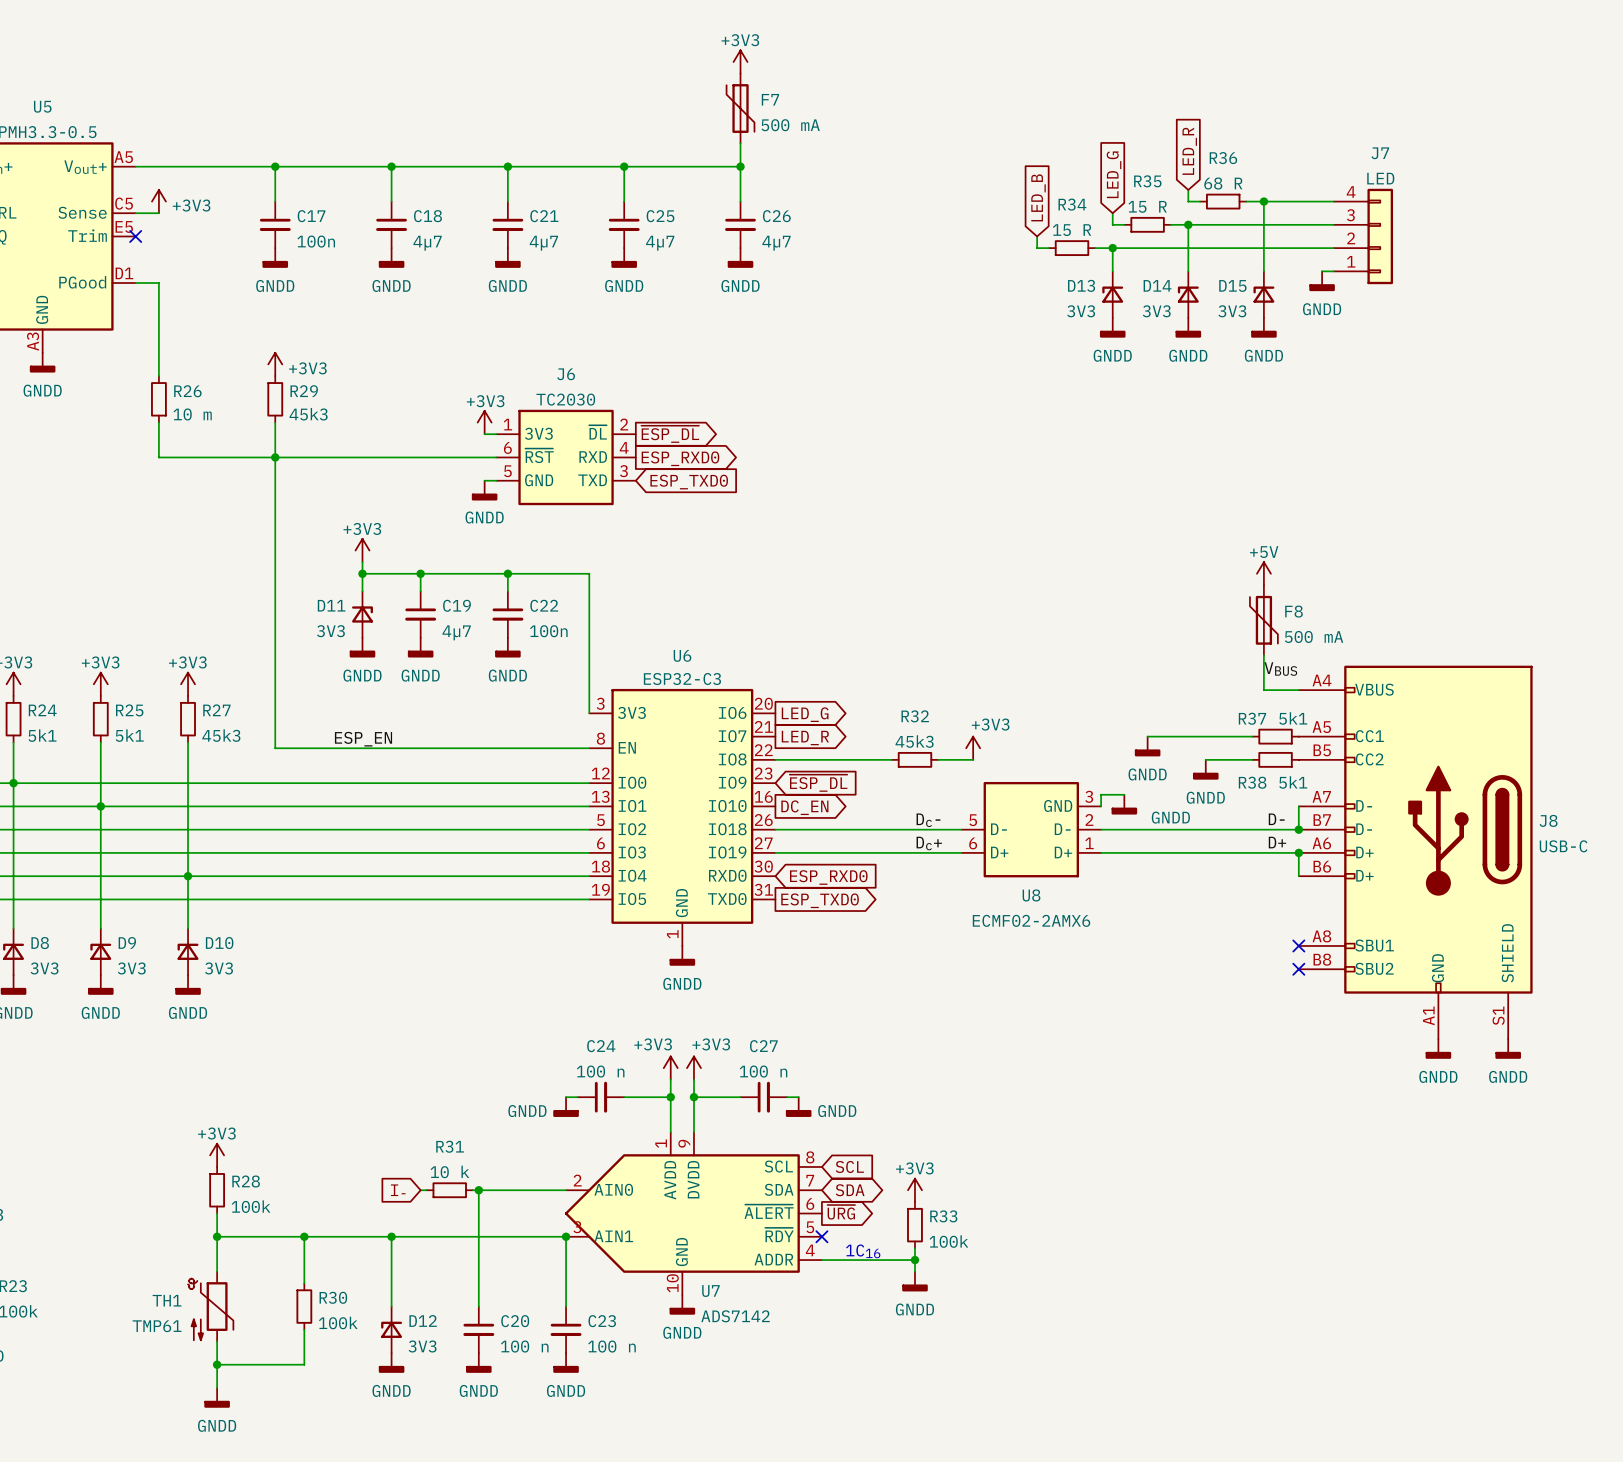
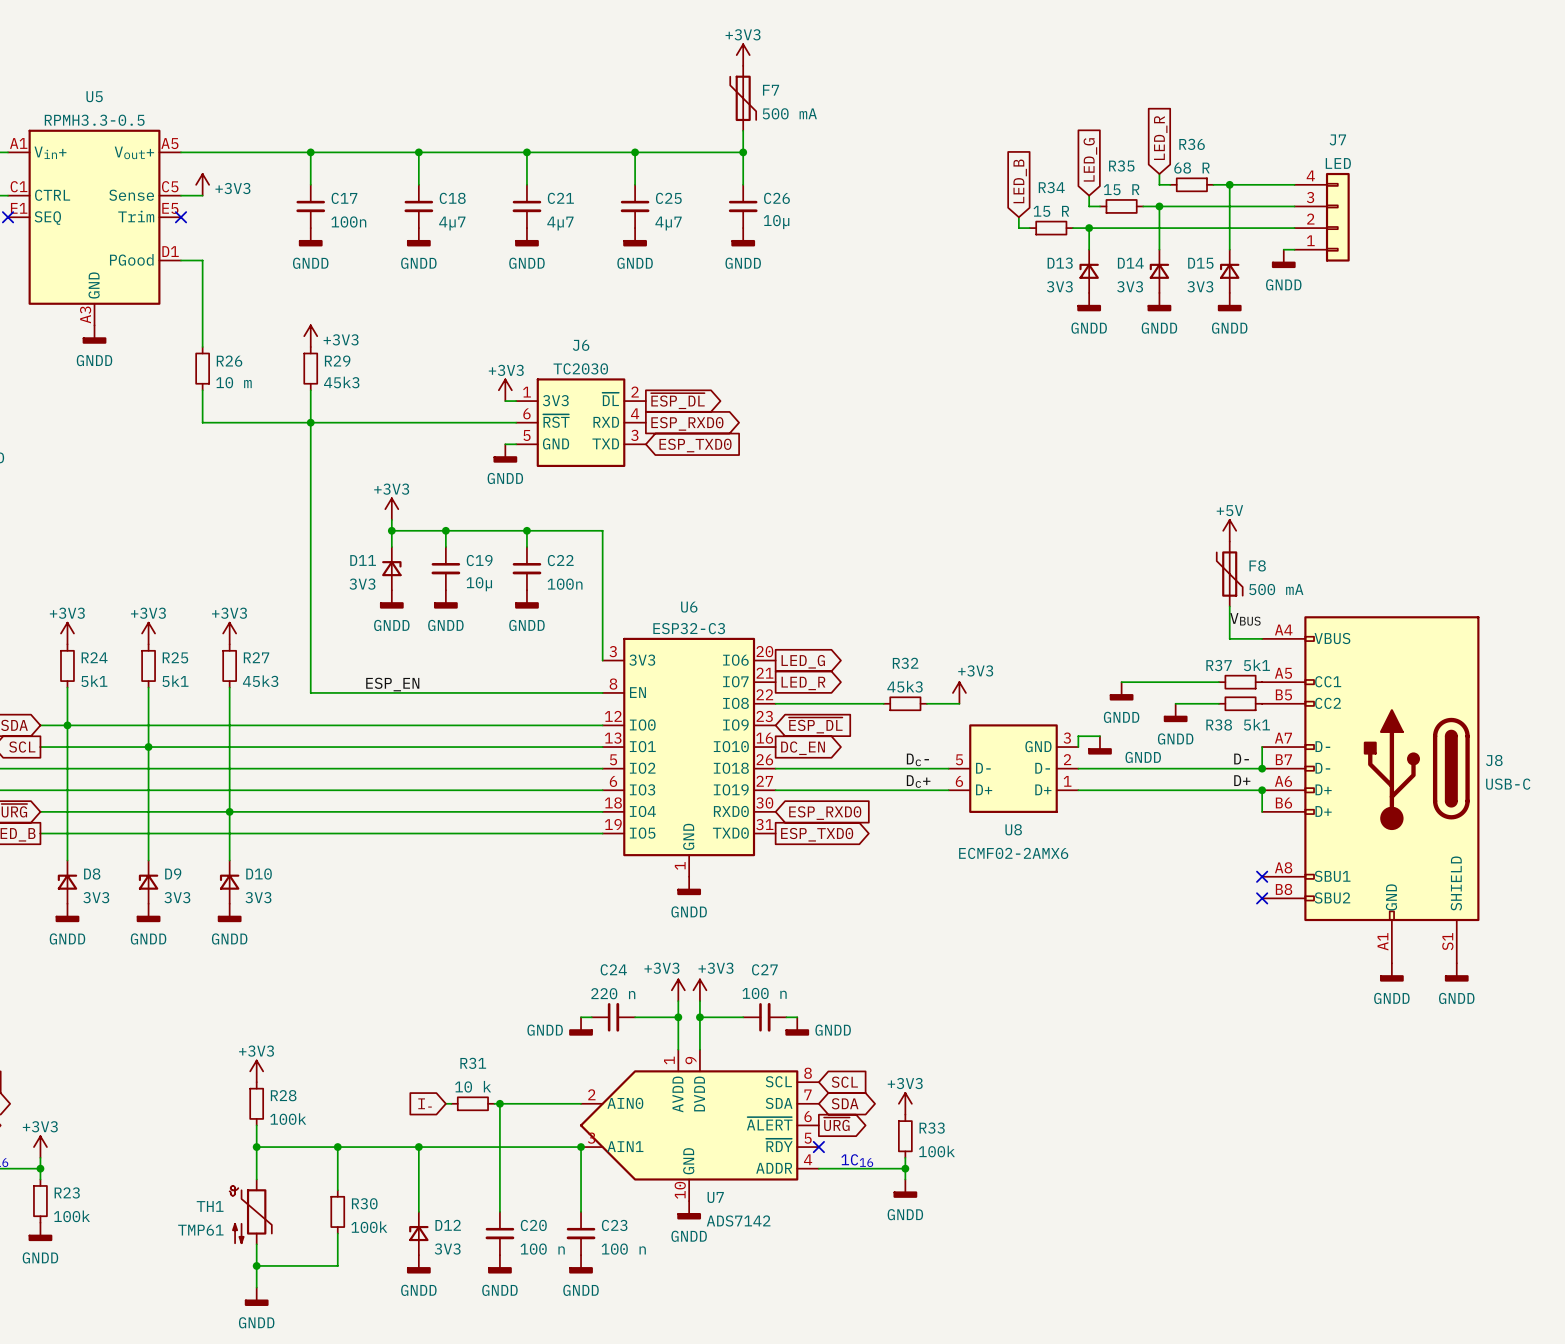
C26 value: 4µ7 (776, 243) -> 10µ (776, 222)
C19 value: 4µ7 (456, 632) -> 10µ (479, 584)
C24 value: 100 n (600, 1071) -> 220 n (613, 993)

